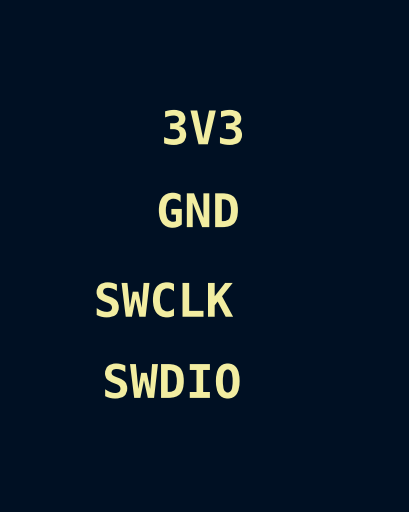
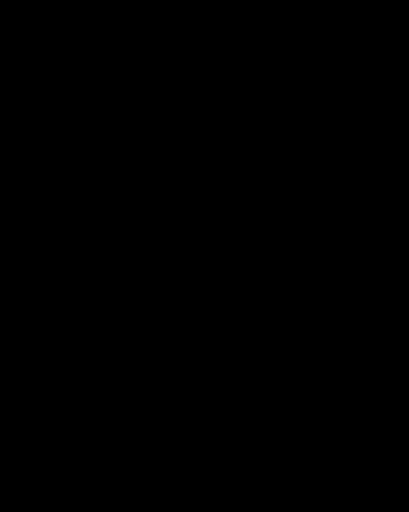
text: 3V3 (203, 127) -> none
text: GND (198, 210) -> none
text: SWCLK (164, 299) -> none
text: SWDIO (172, 381) -> none

